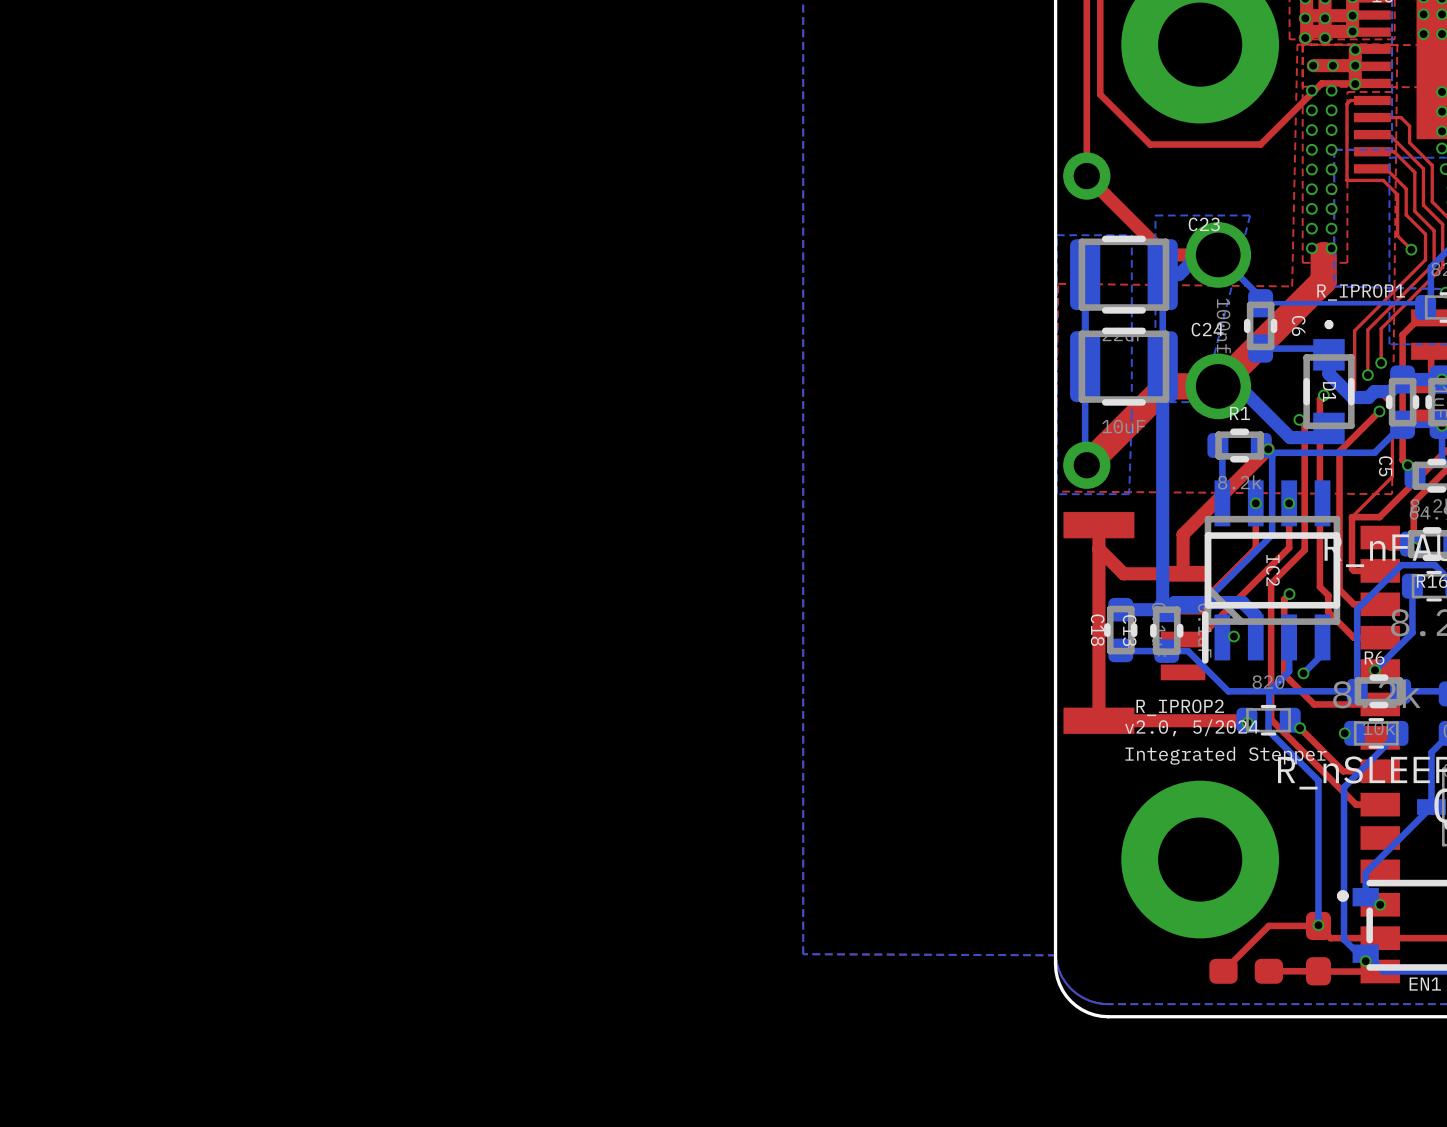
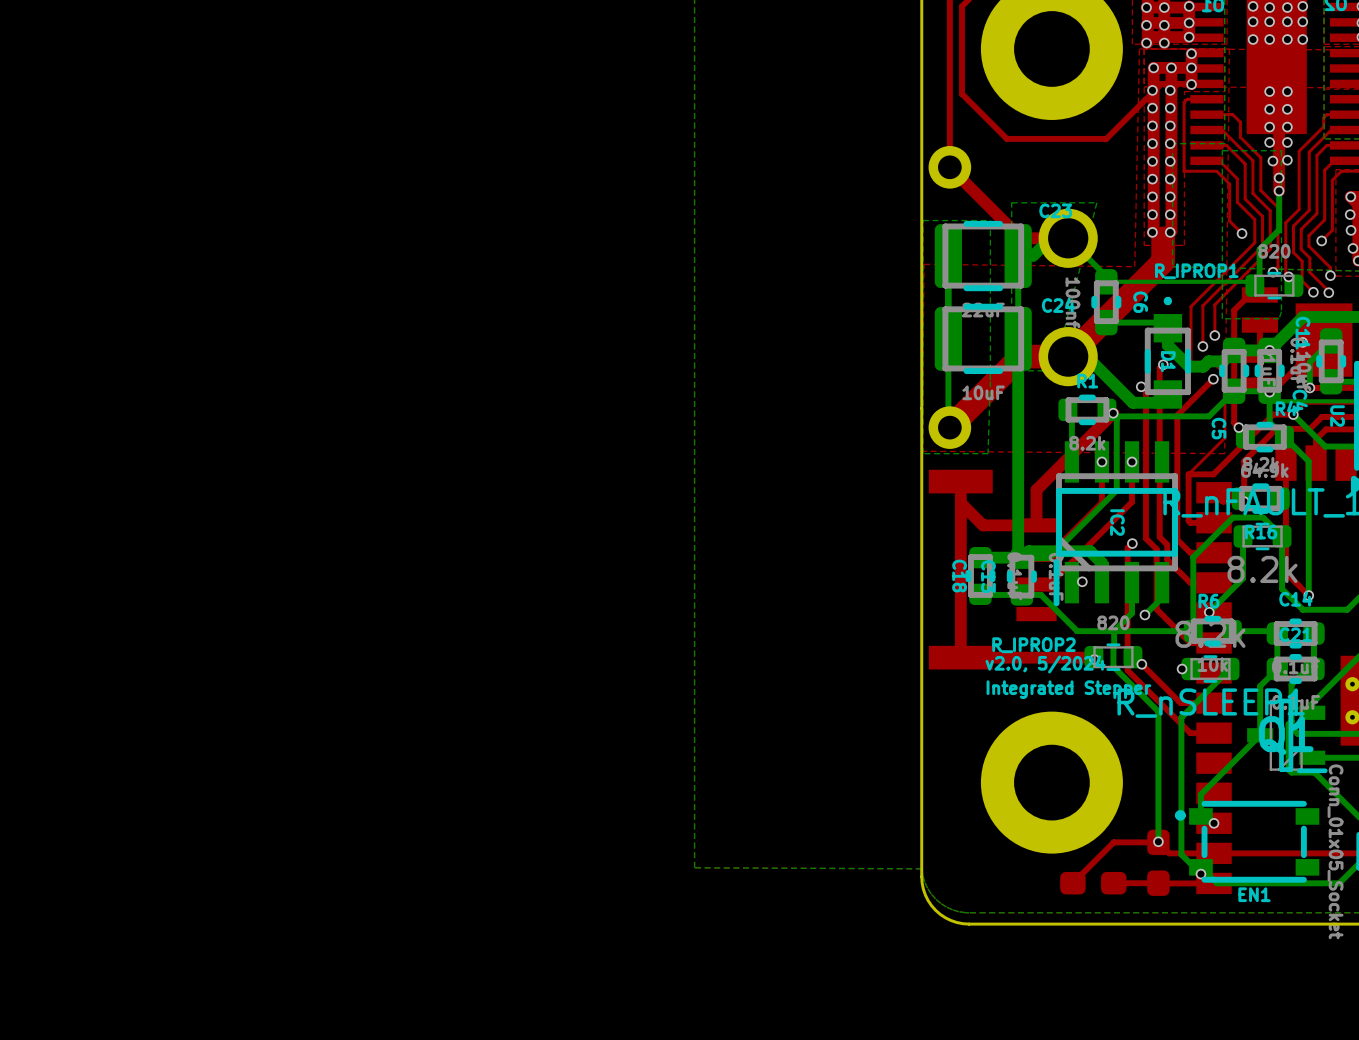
top track: none -> (1153, 67) (1152, 232)
top track: none -> (1171, 67) (1170, 232)
top track: (1304, 550) (1271, 583) (1271, 719) (1356, 804) -> (1146, 503) (1146, 538) (1156, 549) (1156, 609) (1190, 642)
top track: (1284, 674) (1314, 704) (1353, 704) -> (1127, 616) (1127, 670) (1192, 733)

